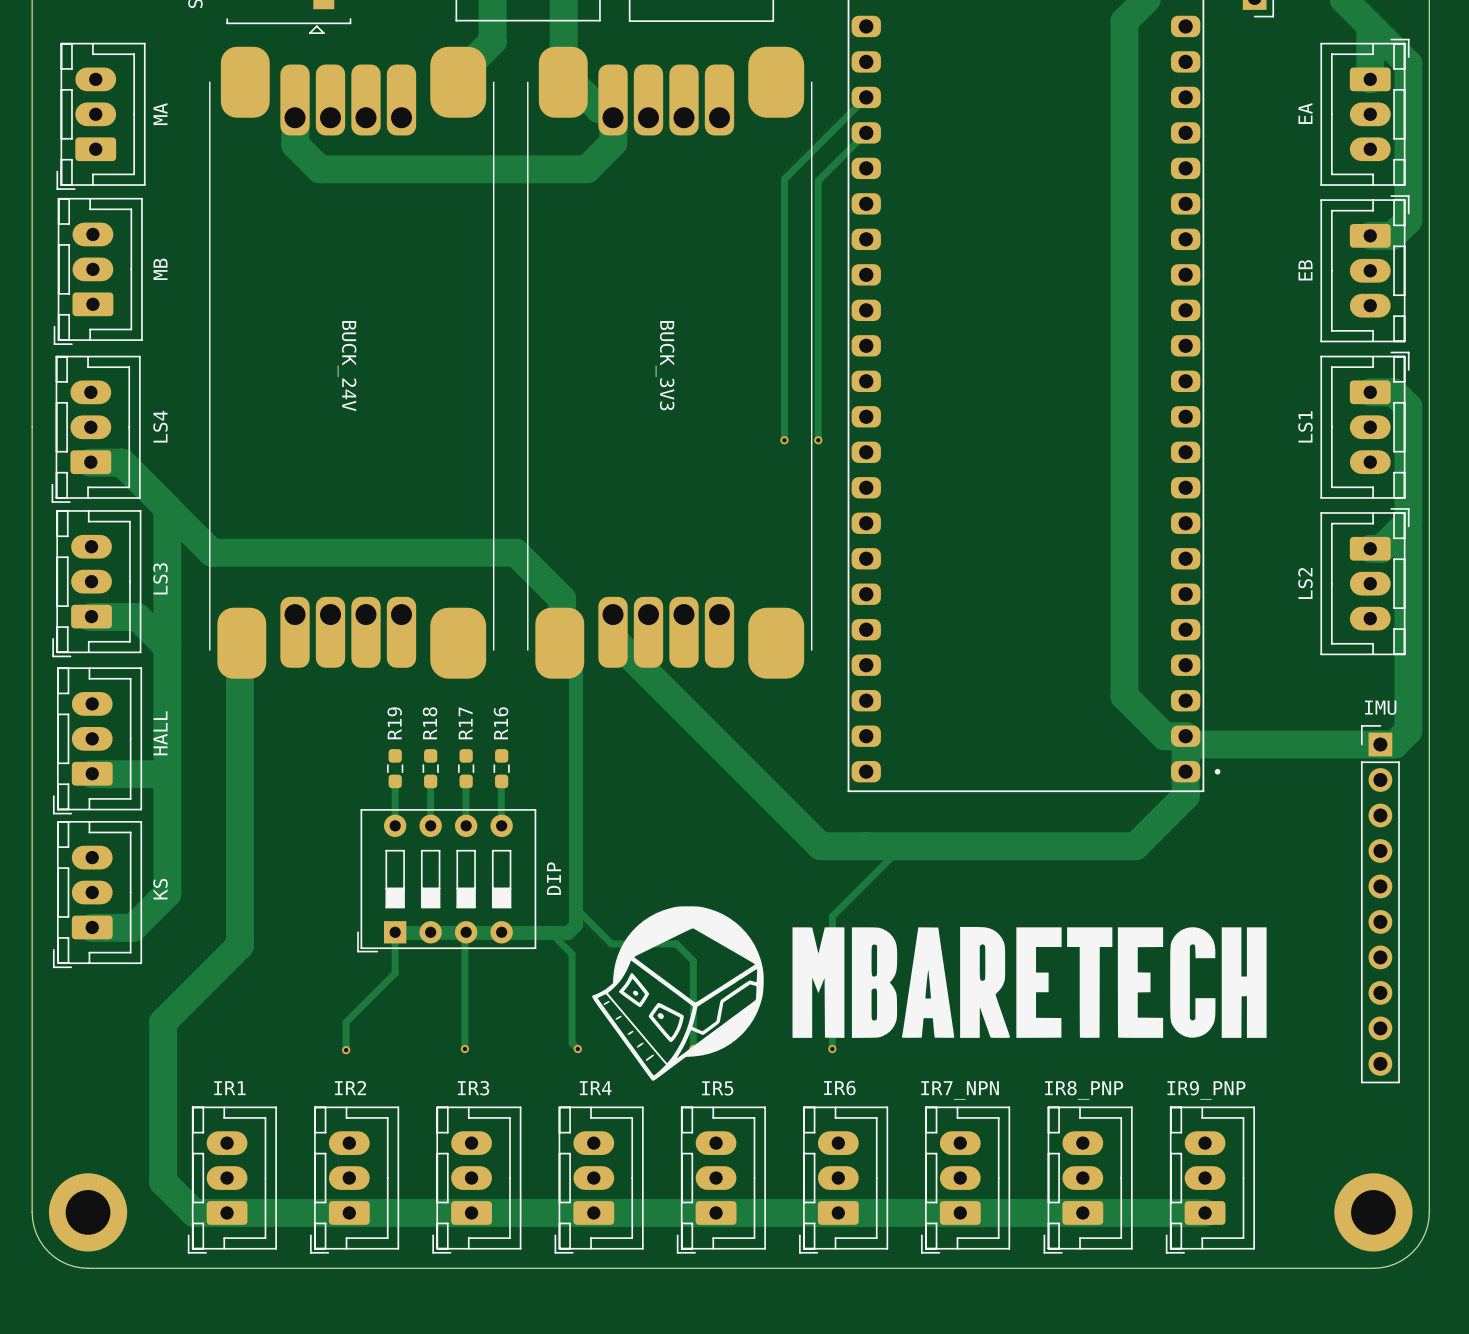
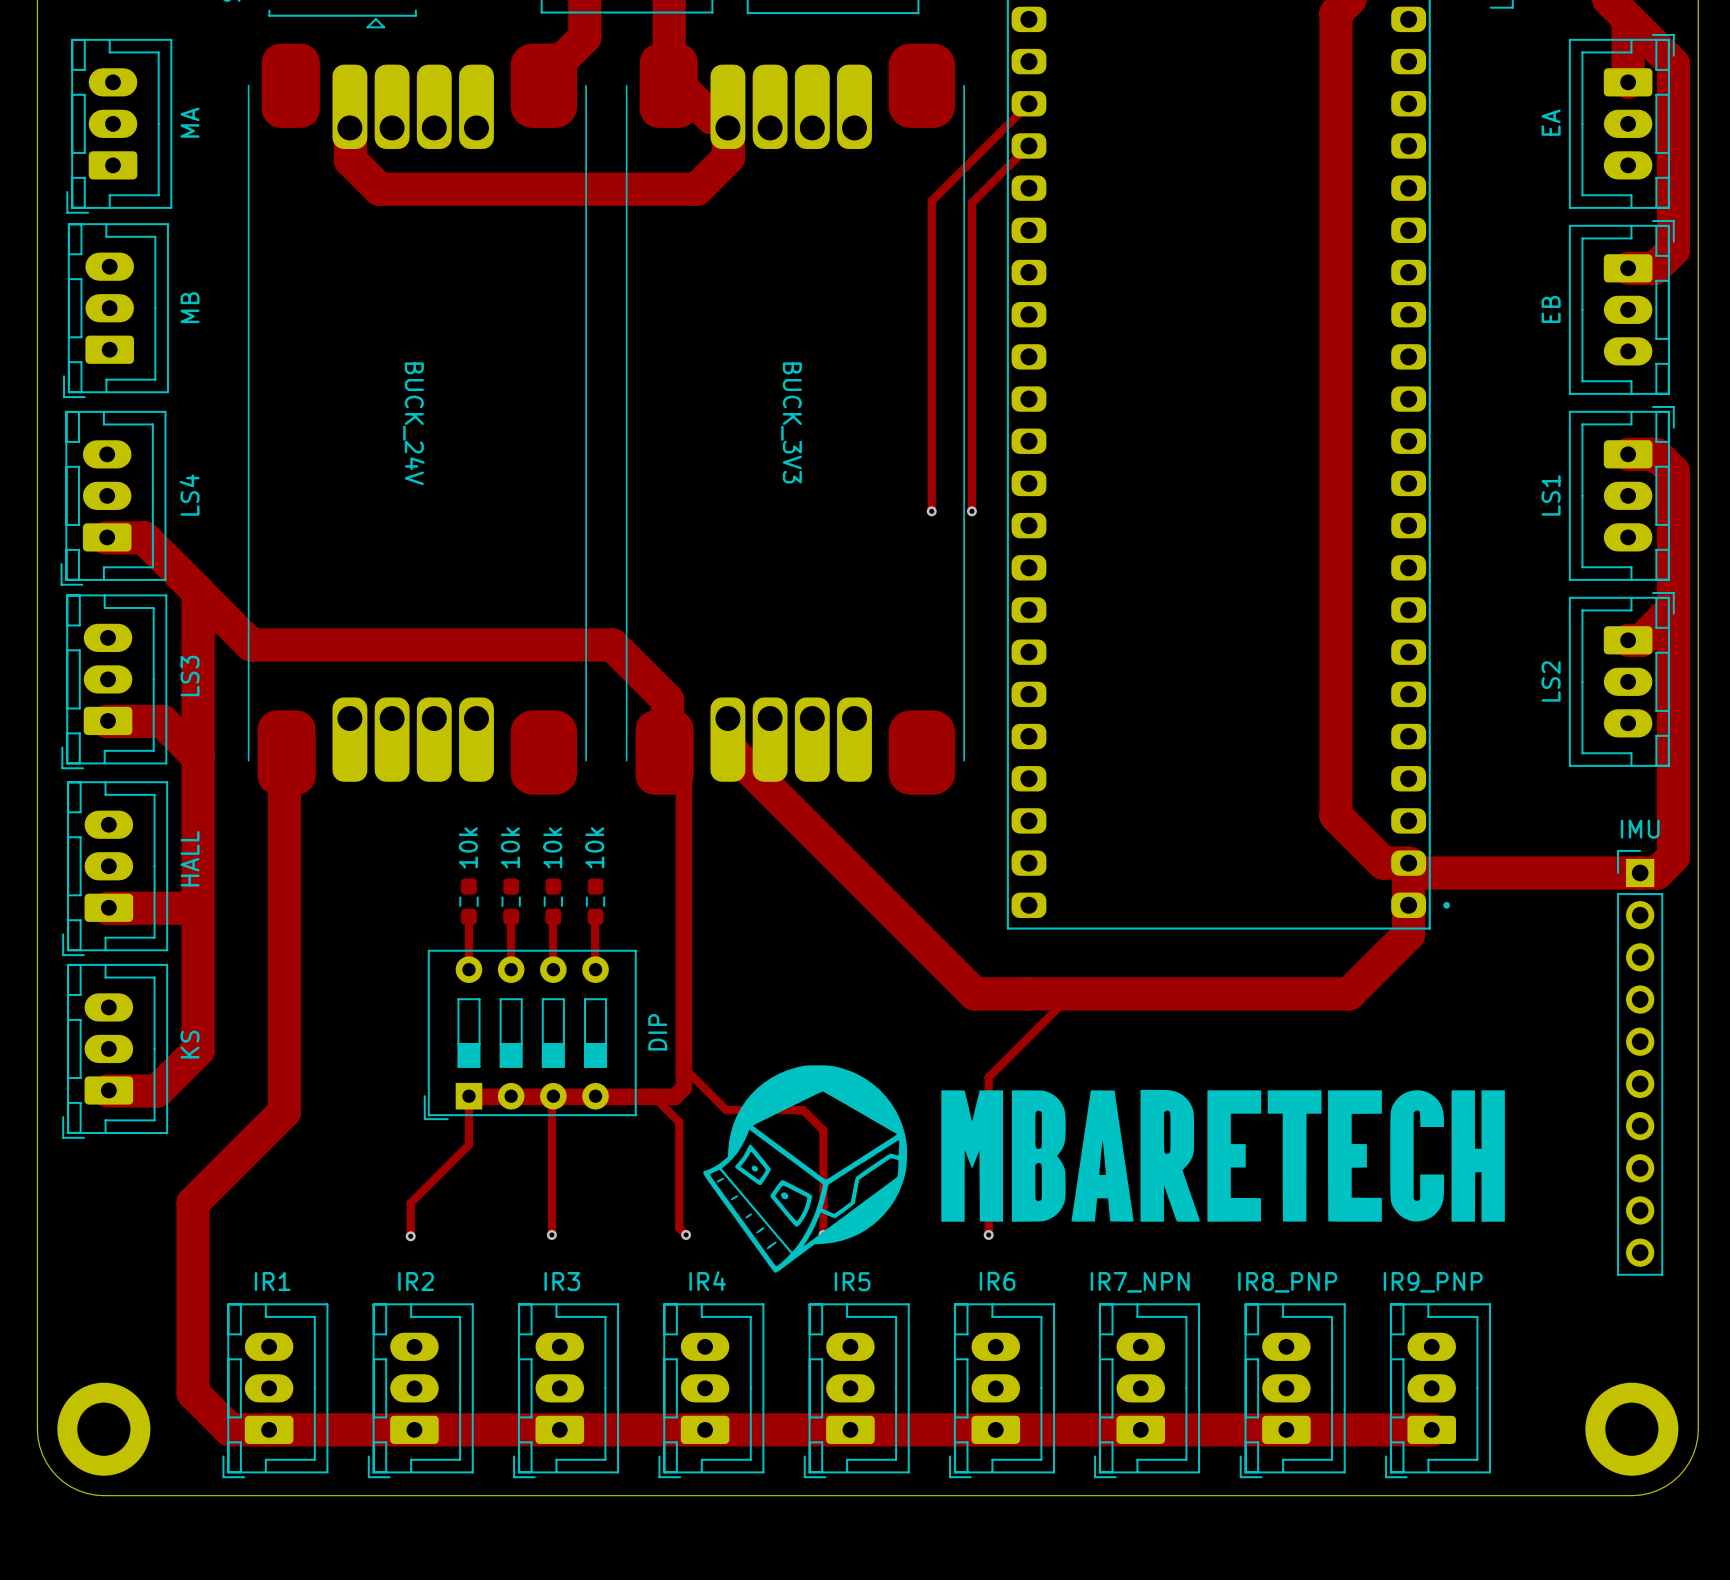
part value: R19 (394, 723) -> 10k (468, 847)
part value: R18 (430, 723) -> 10k (510, 847)
part value: R17 (465, 723) -> 10k (552, 847)
part value: R16 (501, 723) -> 10k (594, 847)

